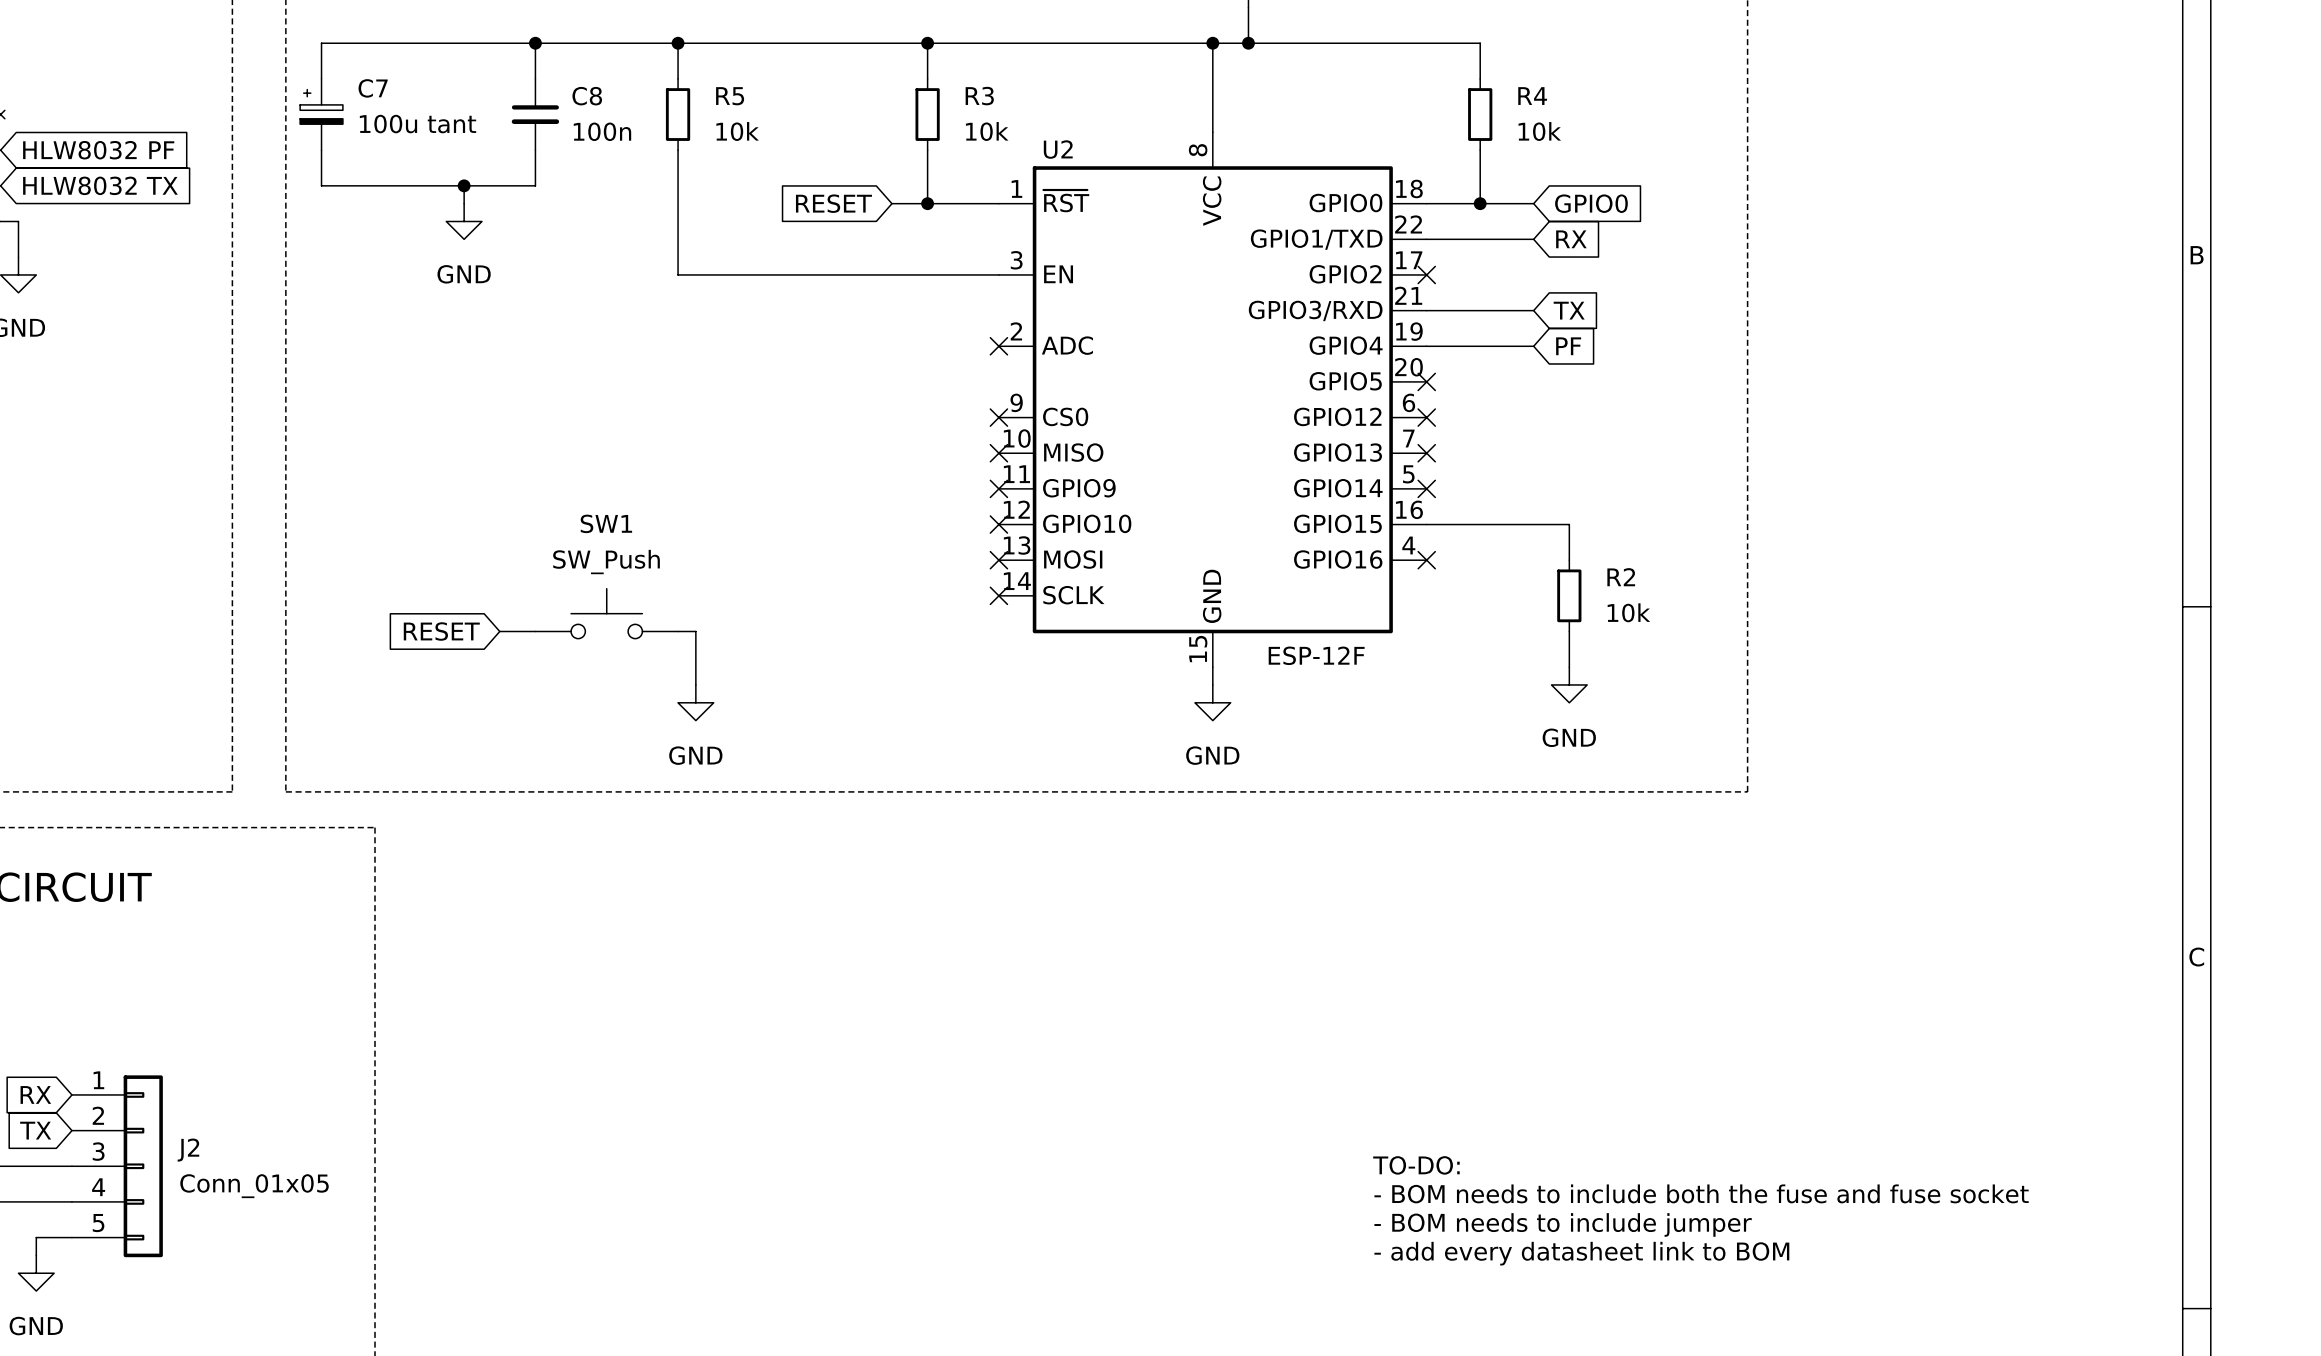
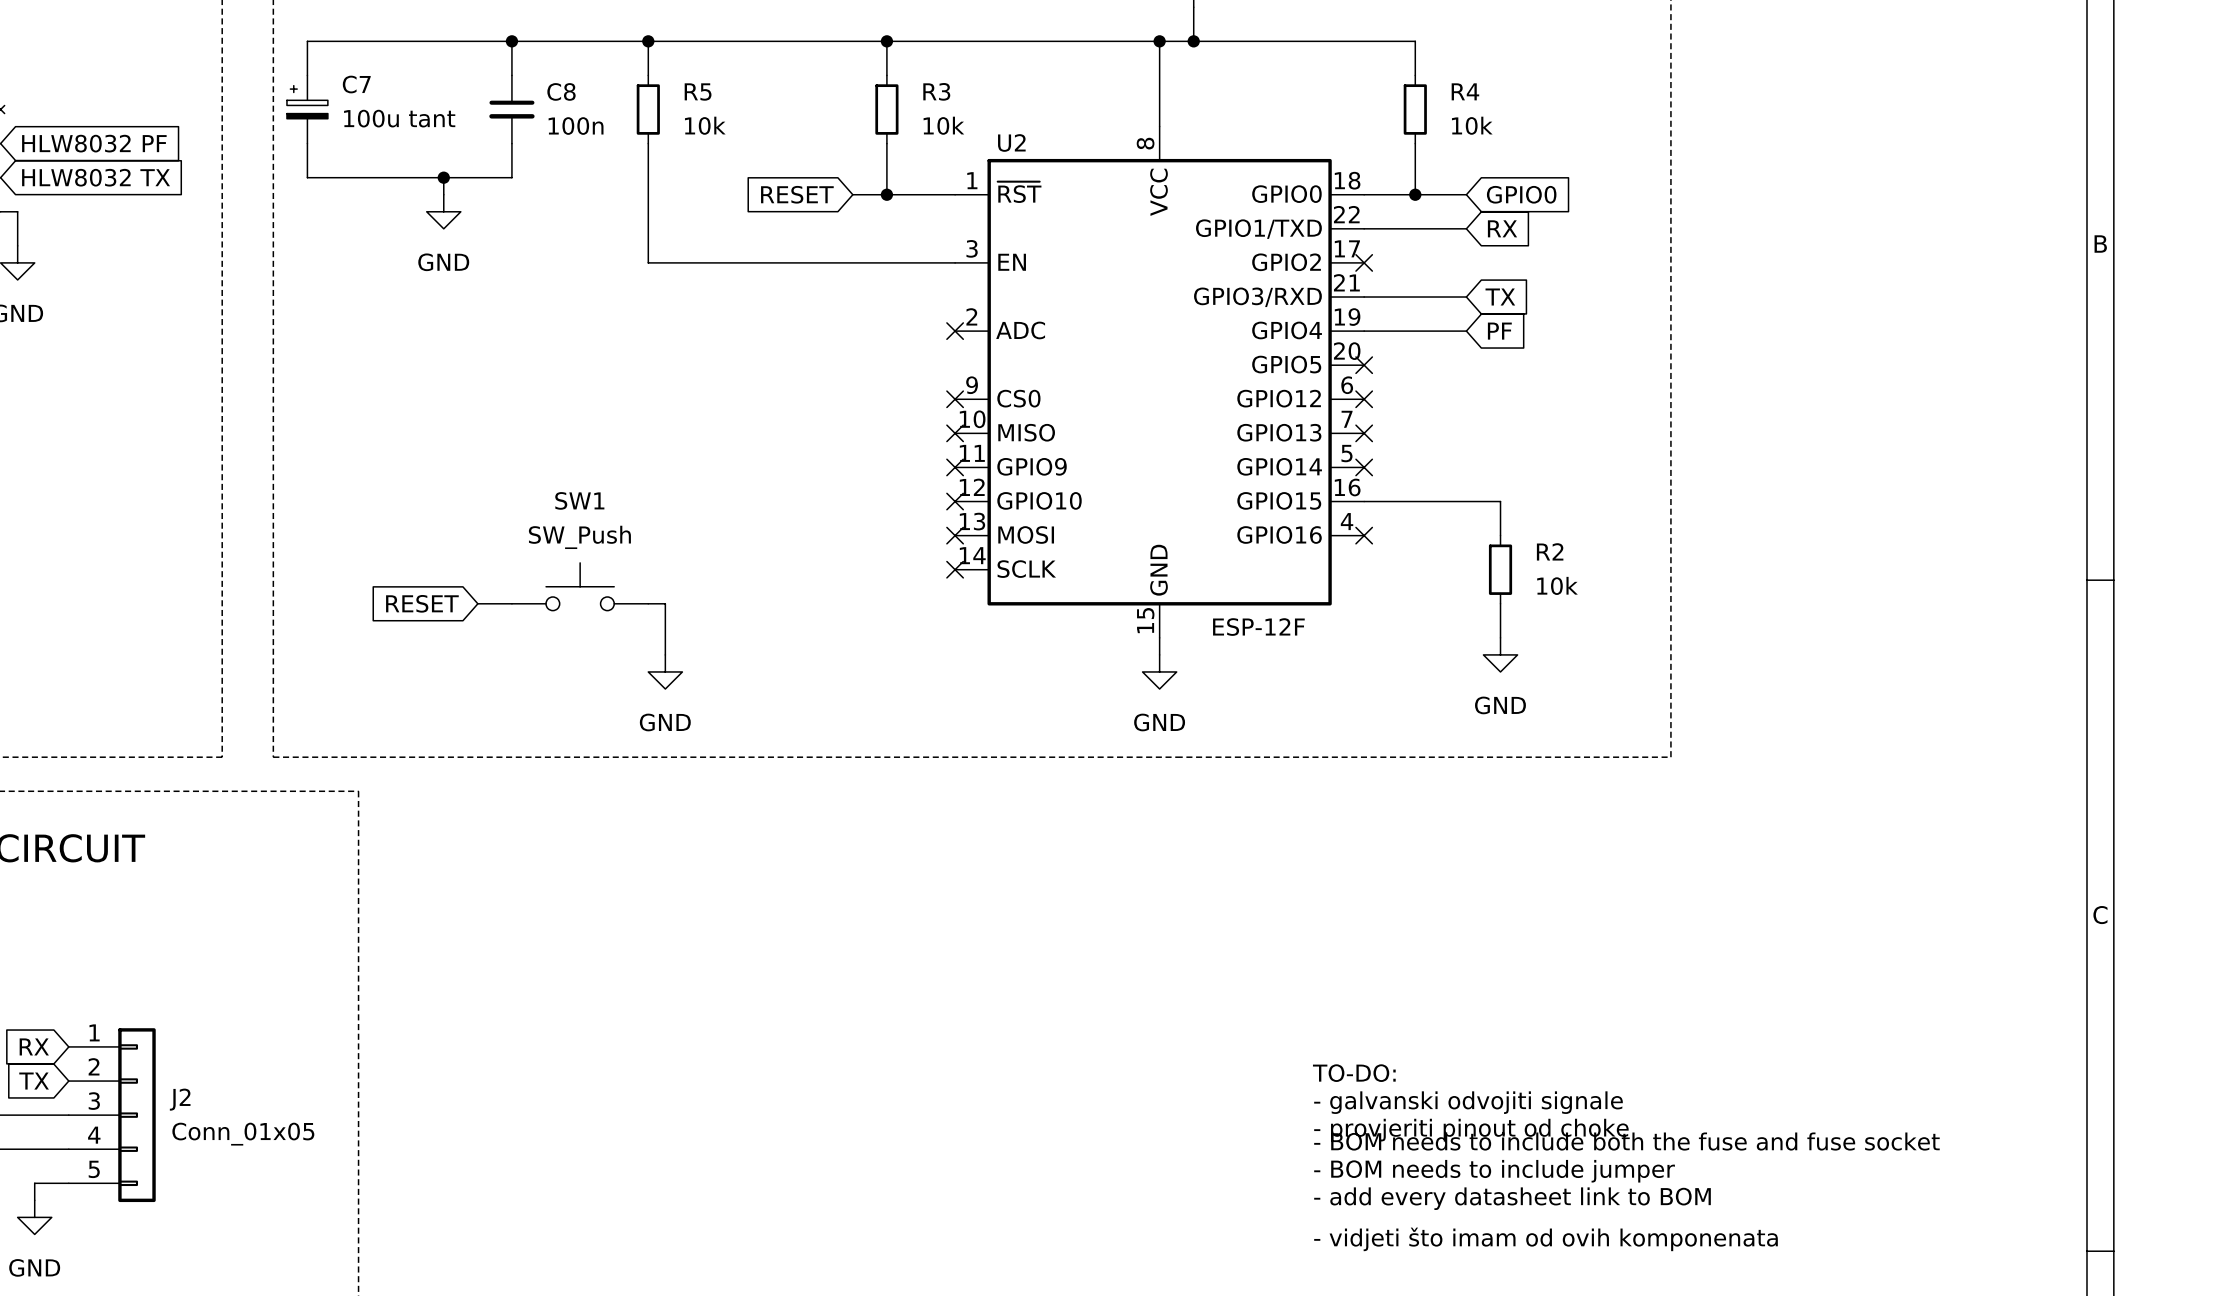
text: none -> - galvanski odvojiti signale (1468, 1102)
text position: TO-DO: (1416, 1165) -> TO-DO: (1354, 1073)
text: none -> - provjeriti pinout od choke (1471, 1130)
text: none -> - vidjeti što imam od ovih komponenata (1546, 1239)

